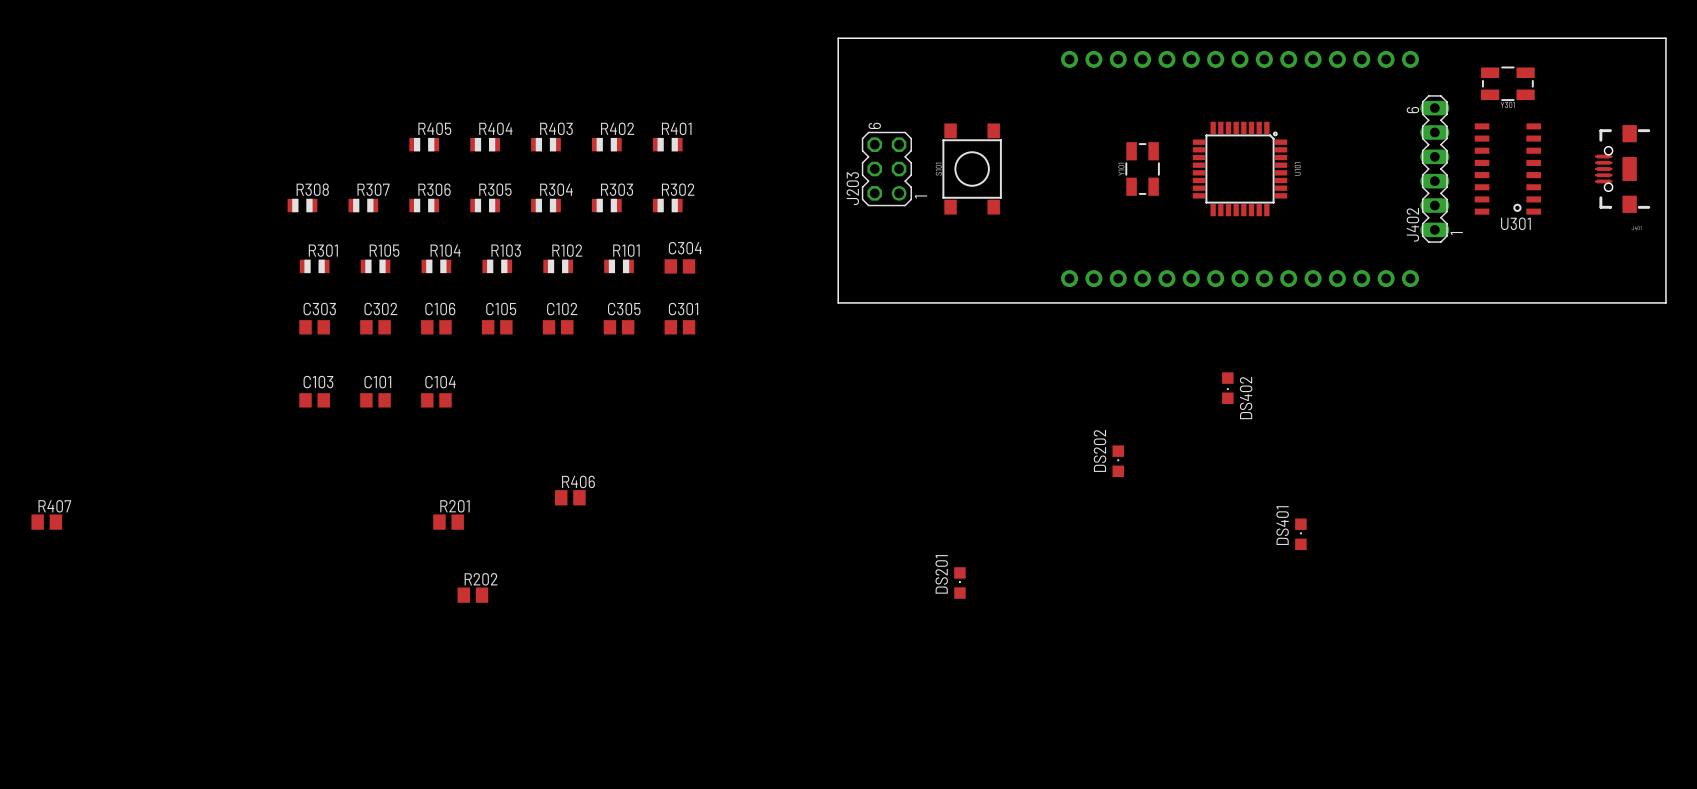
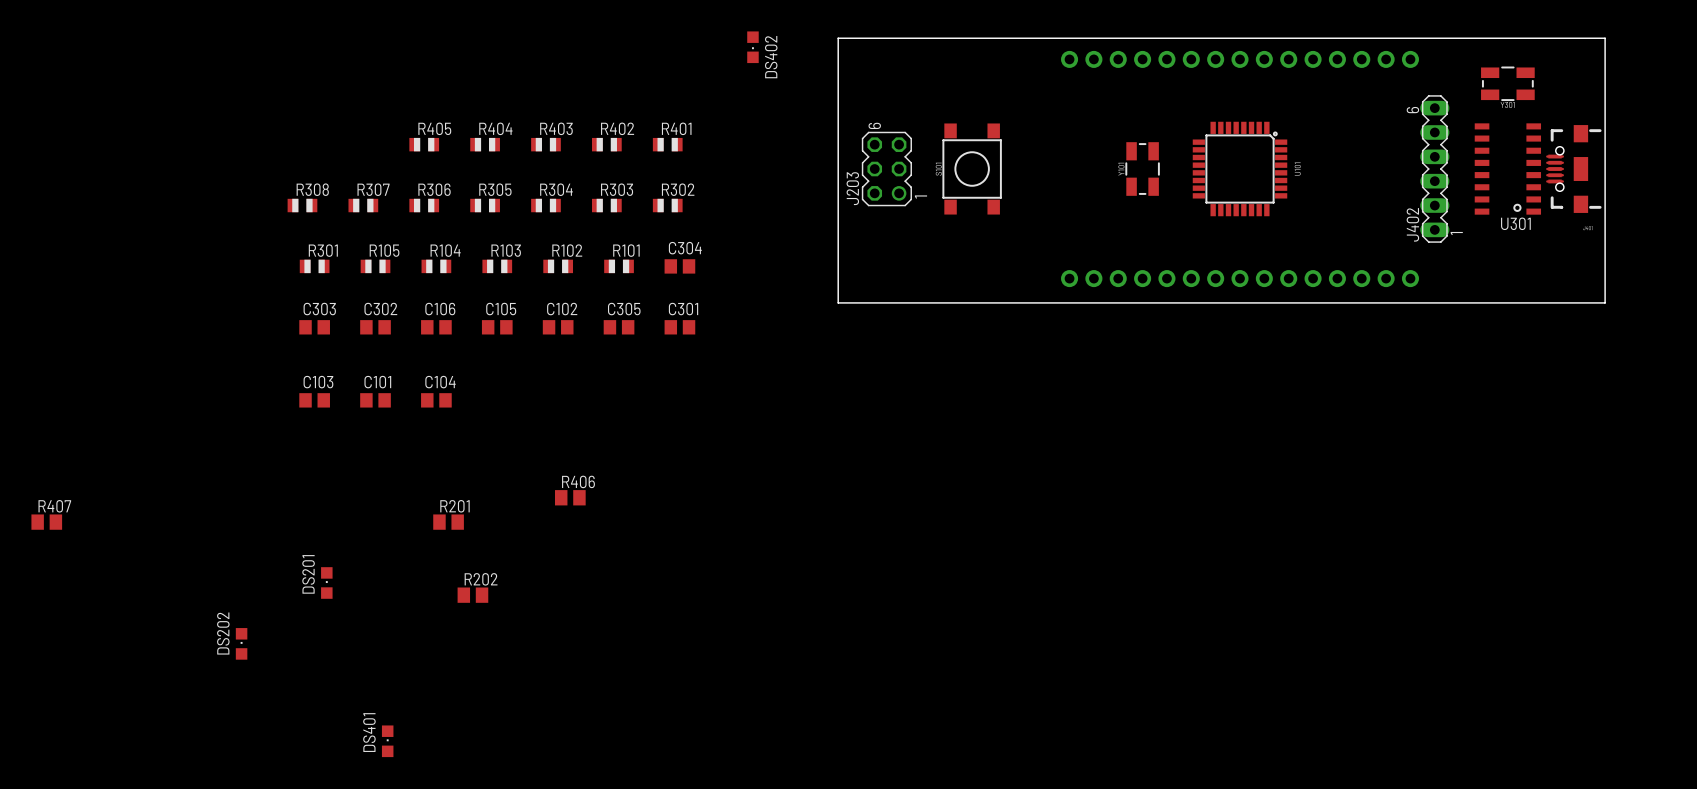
board edge: (1605, 38) (1665, 38) (1665, 302) (1605, 302) -> (1605, 38) (1605, 302)
part position: (1622, 169) -> (1573, 169)
DS402 position: (1227, 388) -> (752, 47)
DS202 position: (1118, 461) -> (241, 643)
DS401 position: (1300, 534) -> (387, 741)
DS201 position: (959, 582) -> (326, 582)

